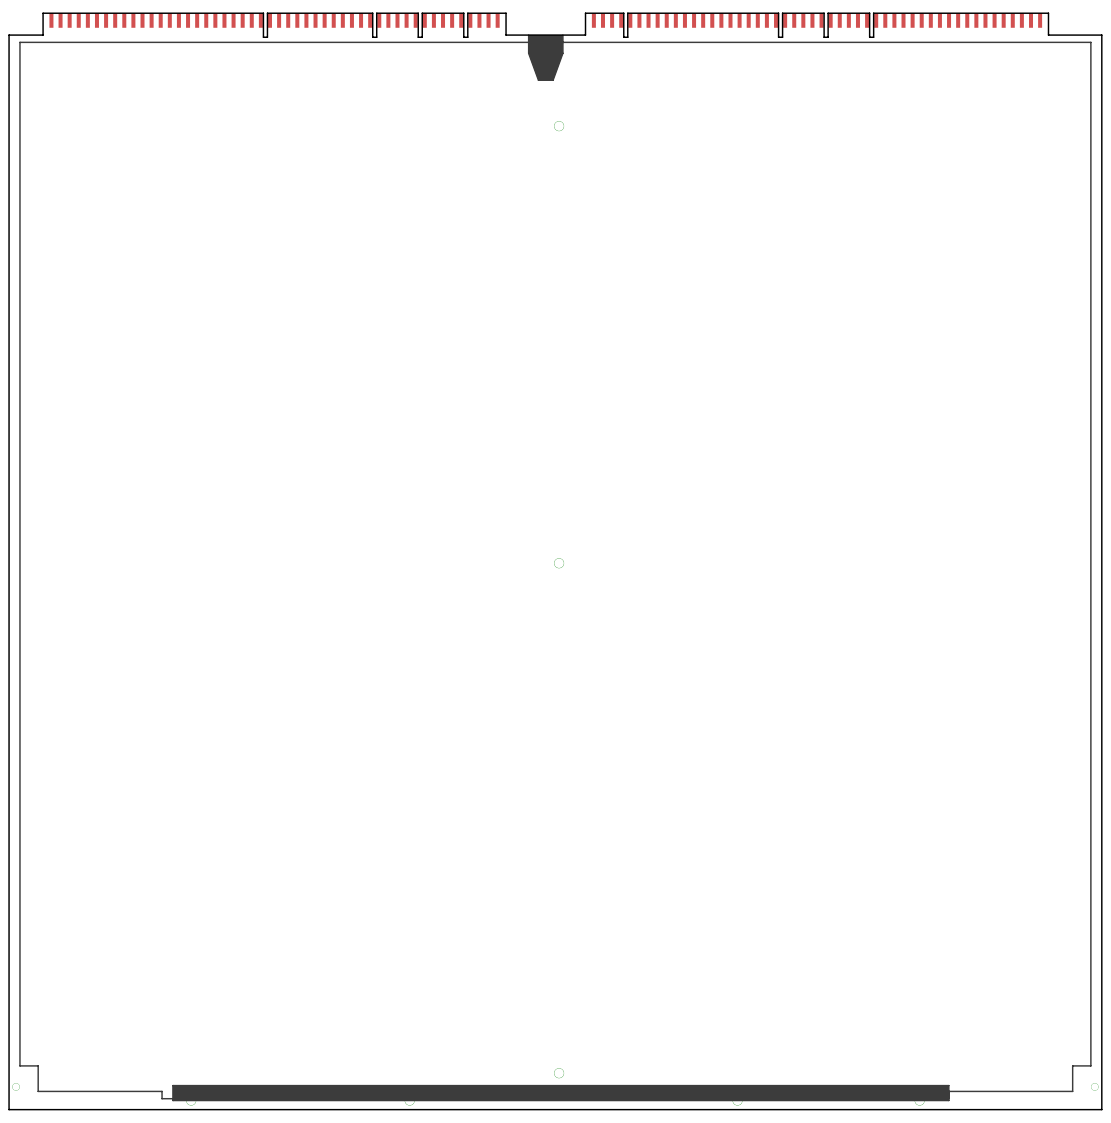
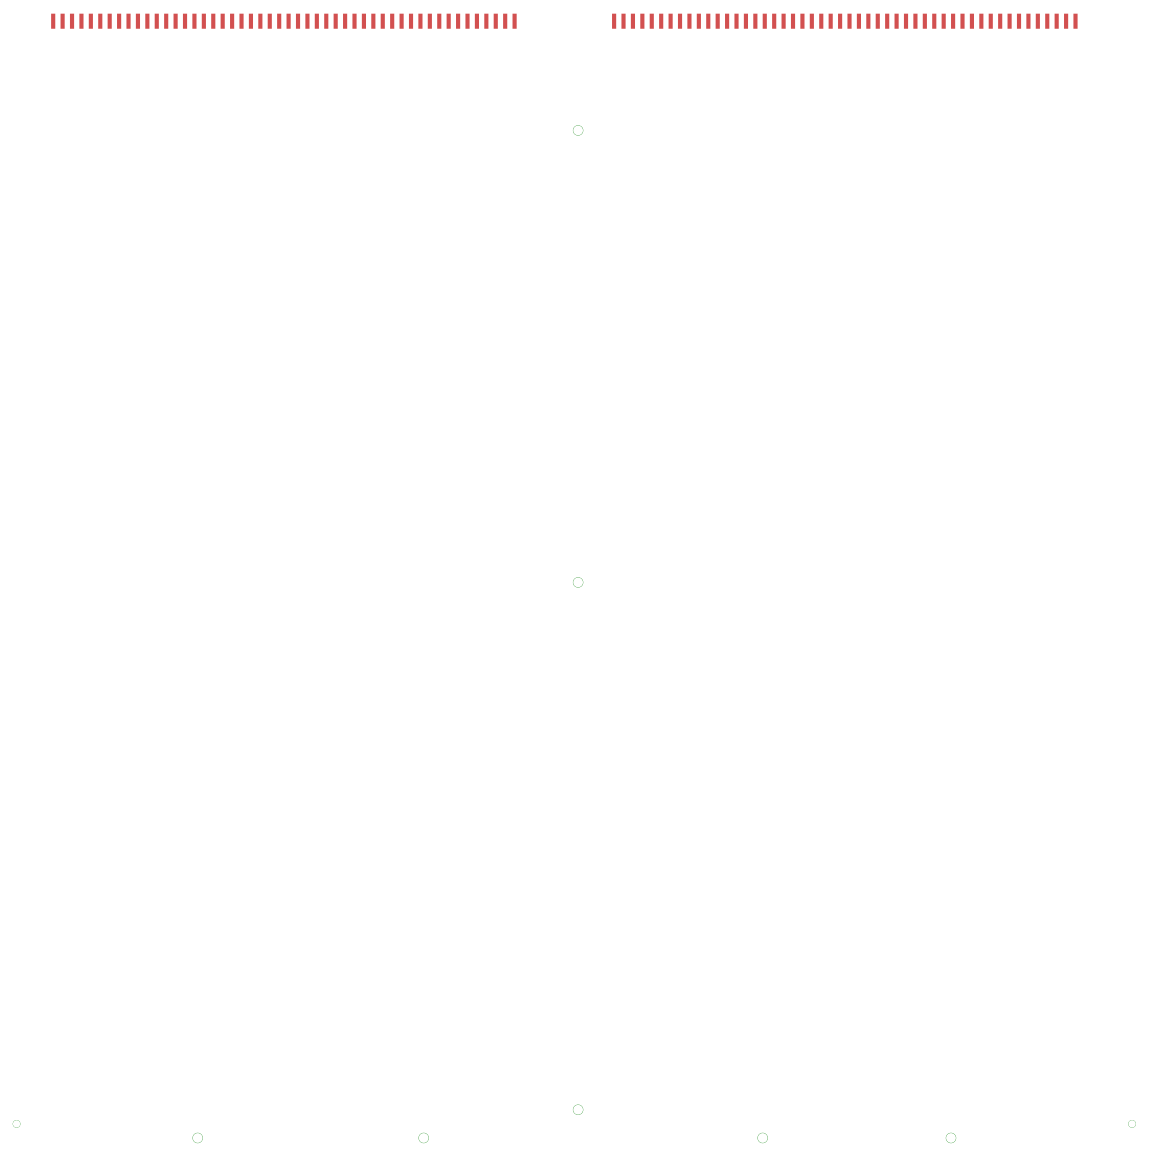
board edge: (43, 13) (263, 13) (263, 37) (267, 37) (267, 13) (372, 13) (372, 37) (376, 37) (376, 13) (418, 13) (418, 37) (422, 37) (422, 13) (463, 13) (463, 37) (467, 37) (467, 13) (506, 13) (506, 35) (585, 35) (585, 13) (623, 13) (623, 37) (627, 37) (627, 13) (778, 13) (778, 37) (782, 37) (782, 13) (824, 13) (824, 37) (828, 37) (828, 13) (869, 13) (869, 37) (873, 37) (873, 13) (1048, 13) (1048, 35) (1101, 35) (1101, 1109) (9, 1109) (9, 35) (43, 35) (43, 13) -> none
drawing: [528, 34, 564, 81] -> none
line: (528, 35) (528, 53) (538, 80) (553, 80) (562, 53) (562, 35) -> none
line: (172, 1085) (948, 1085) (948, 1100) (172, 1100) (172, 1085) -> none
drawing: [172, 1085, 949, 1101] -> none
line: (948, 1091) (1072, 1091) (1072, 1065) (1090, 1065) (1090, 42) (19, 42) (19, 1065) (38, 1065) (38, 1091) (162, 1091) (162, 1098) (948, 1098) -> none

